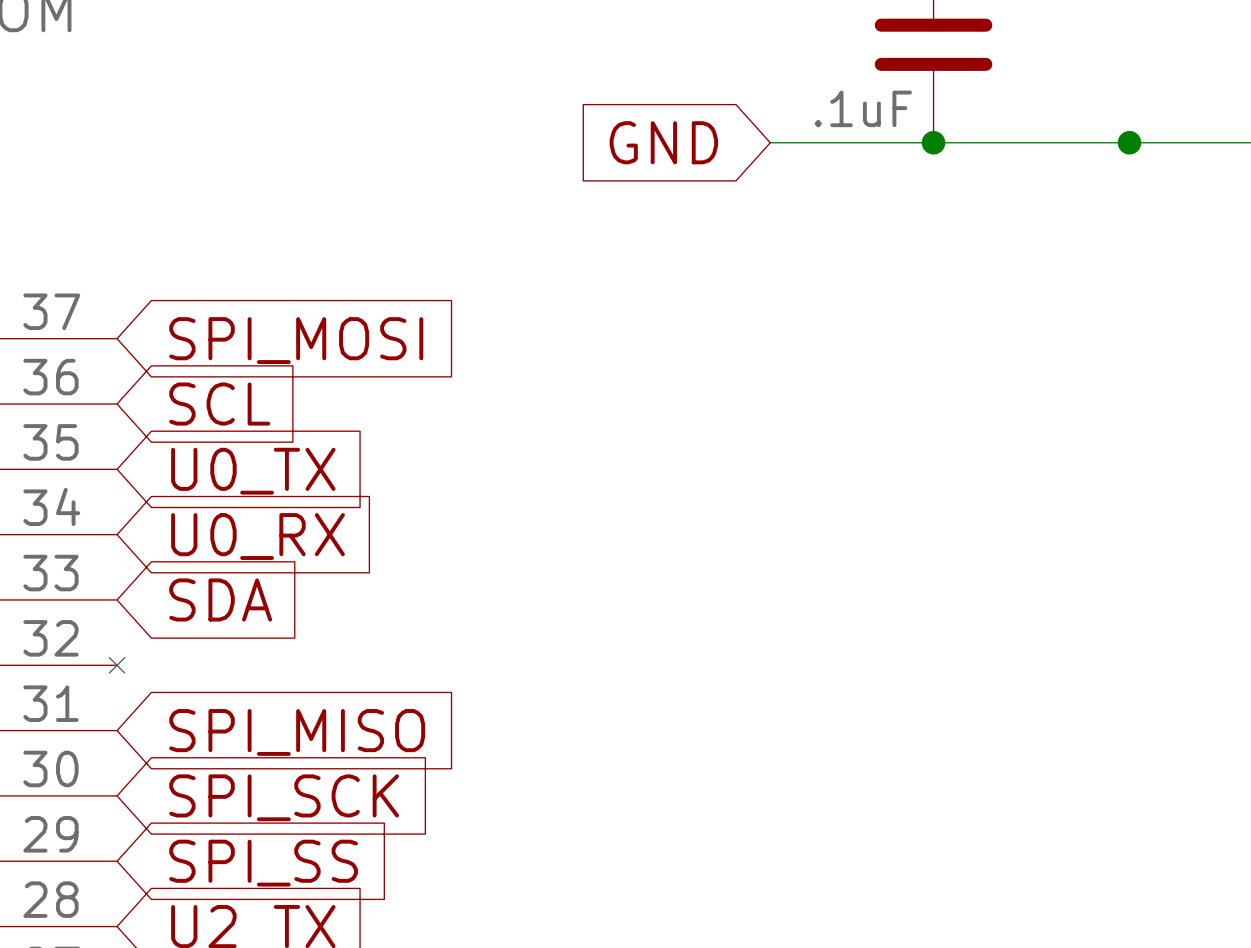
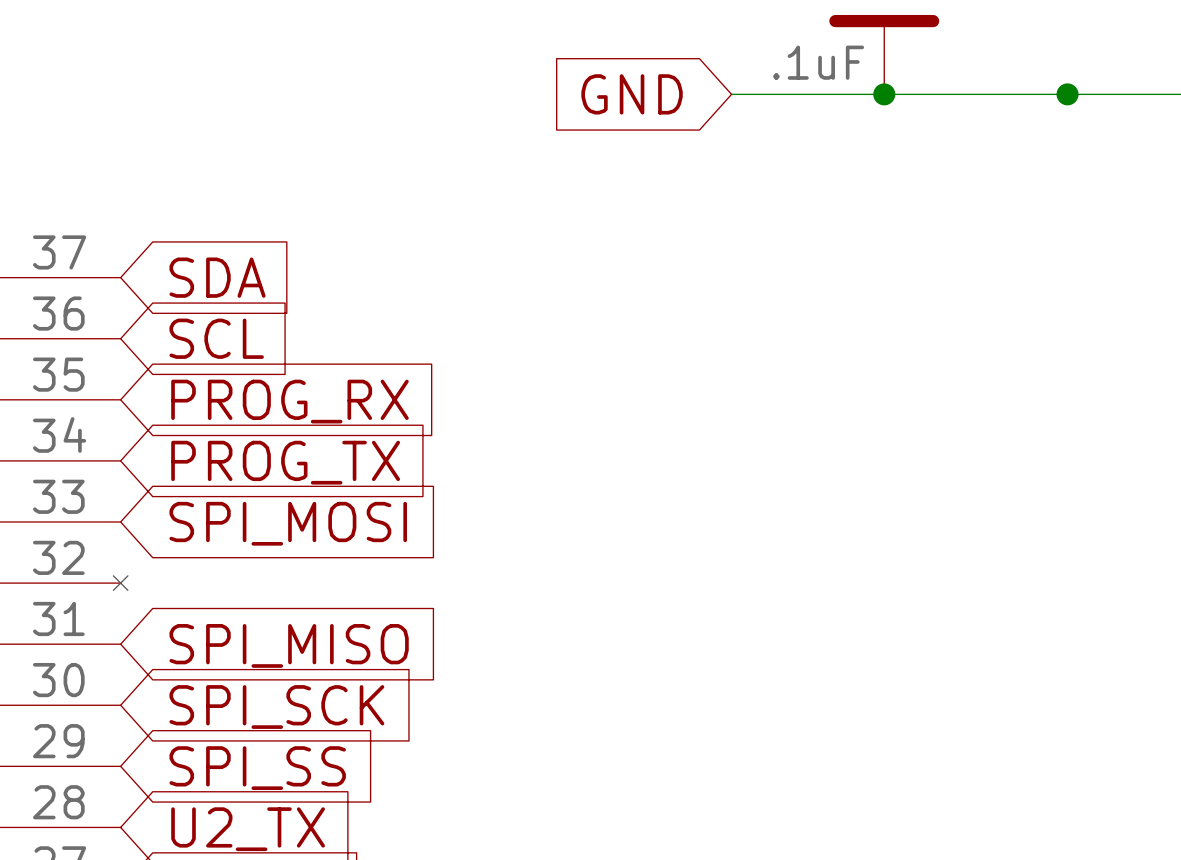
global label: SPI_MOSI (296, 340) -> SDA (217, 277)
global label: U0_TX (253, 471) -> PROG_RX (289, 401)
global label: U0_RX (258, 536) -> PROG_TX (285, 462)
global label: SDA (220, 599) -> SPI_MOSI (288, 523)

